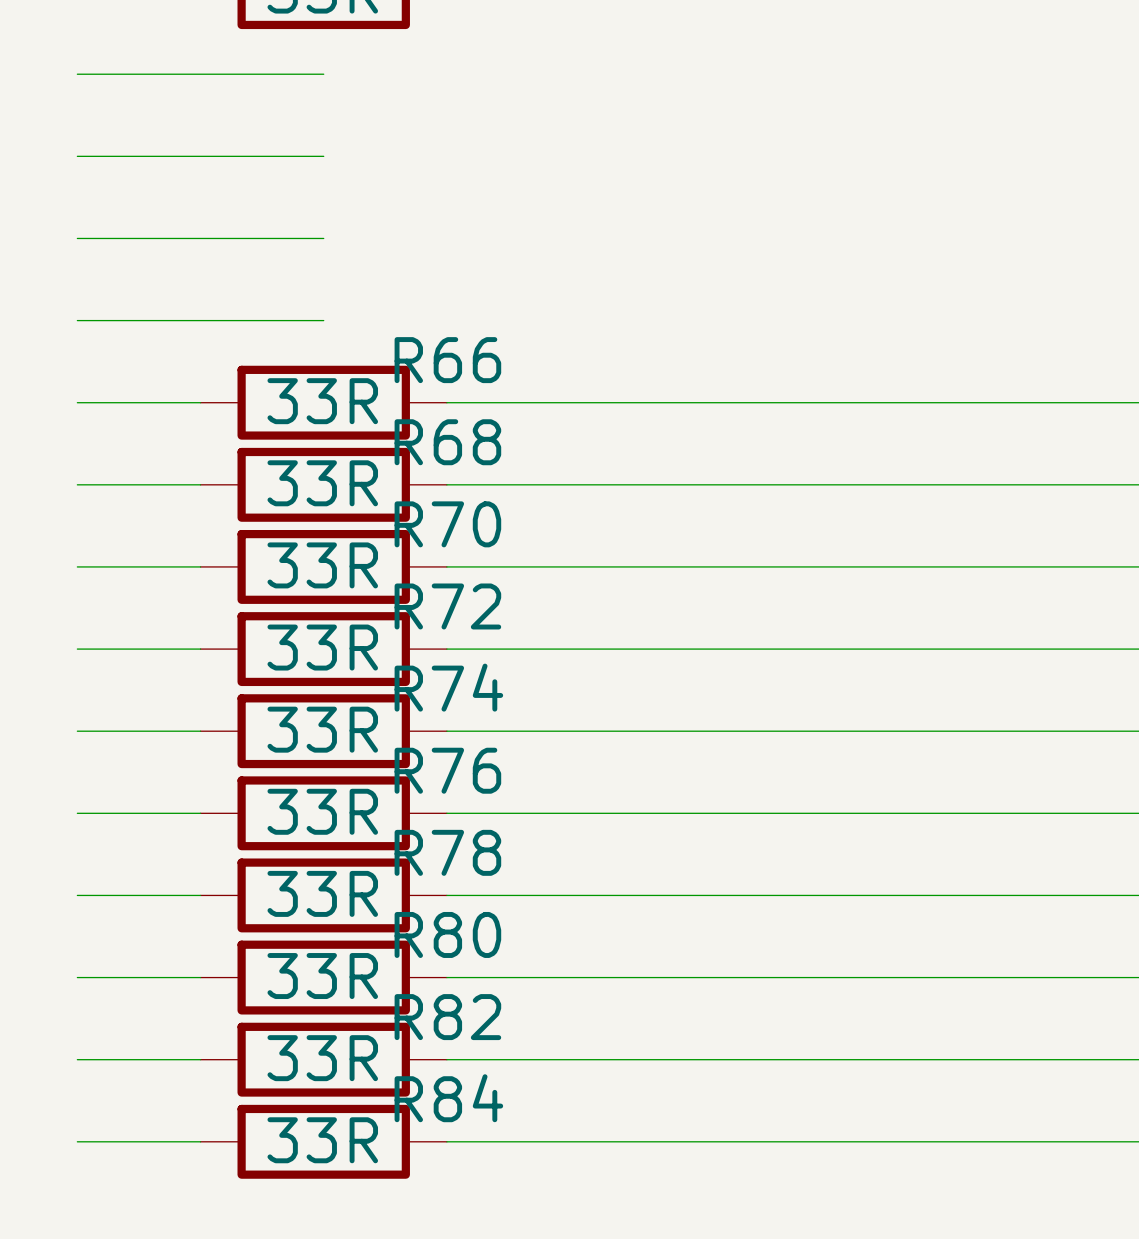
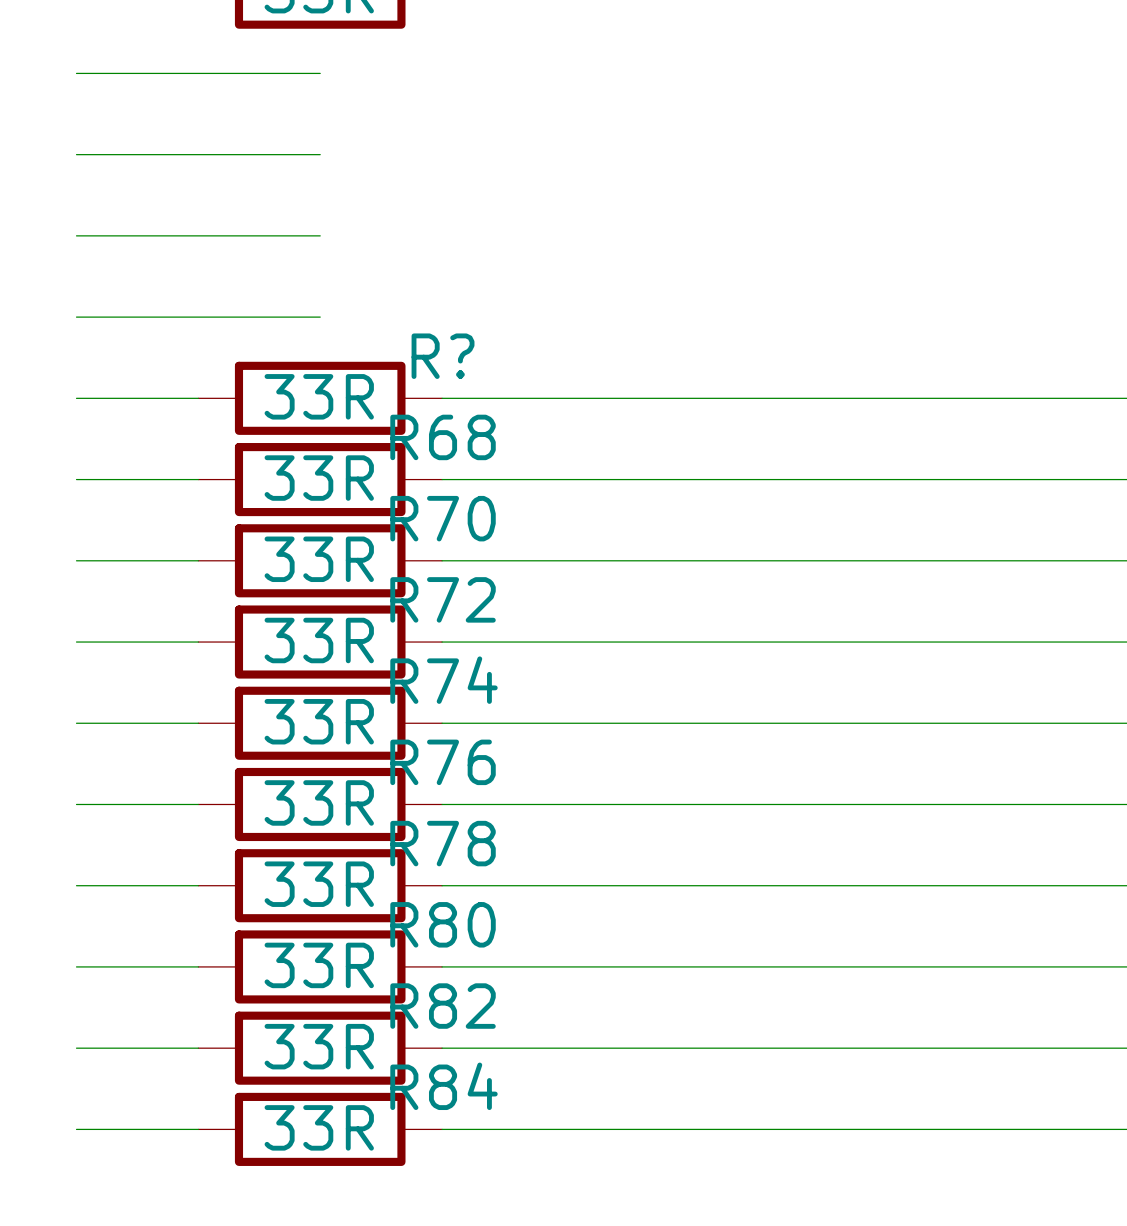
R66 name: R66 (447, 360) -> R? (443, 356)

